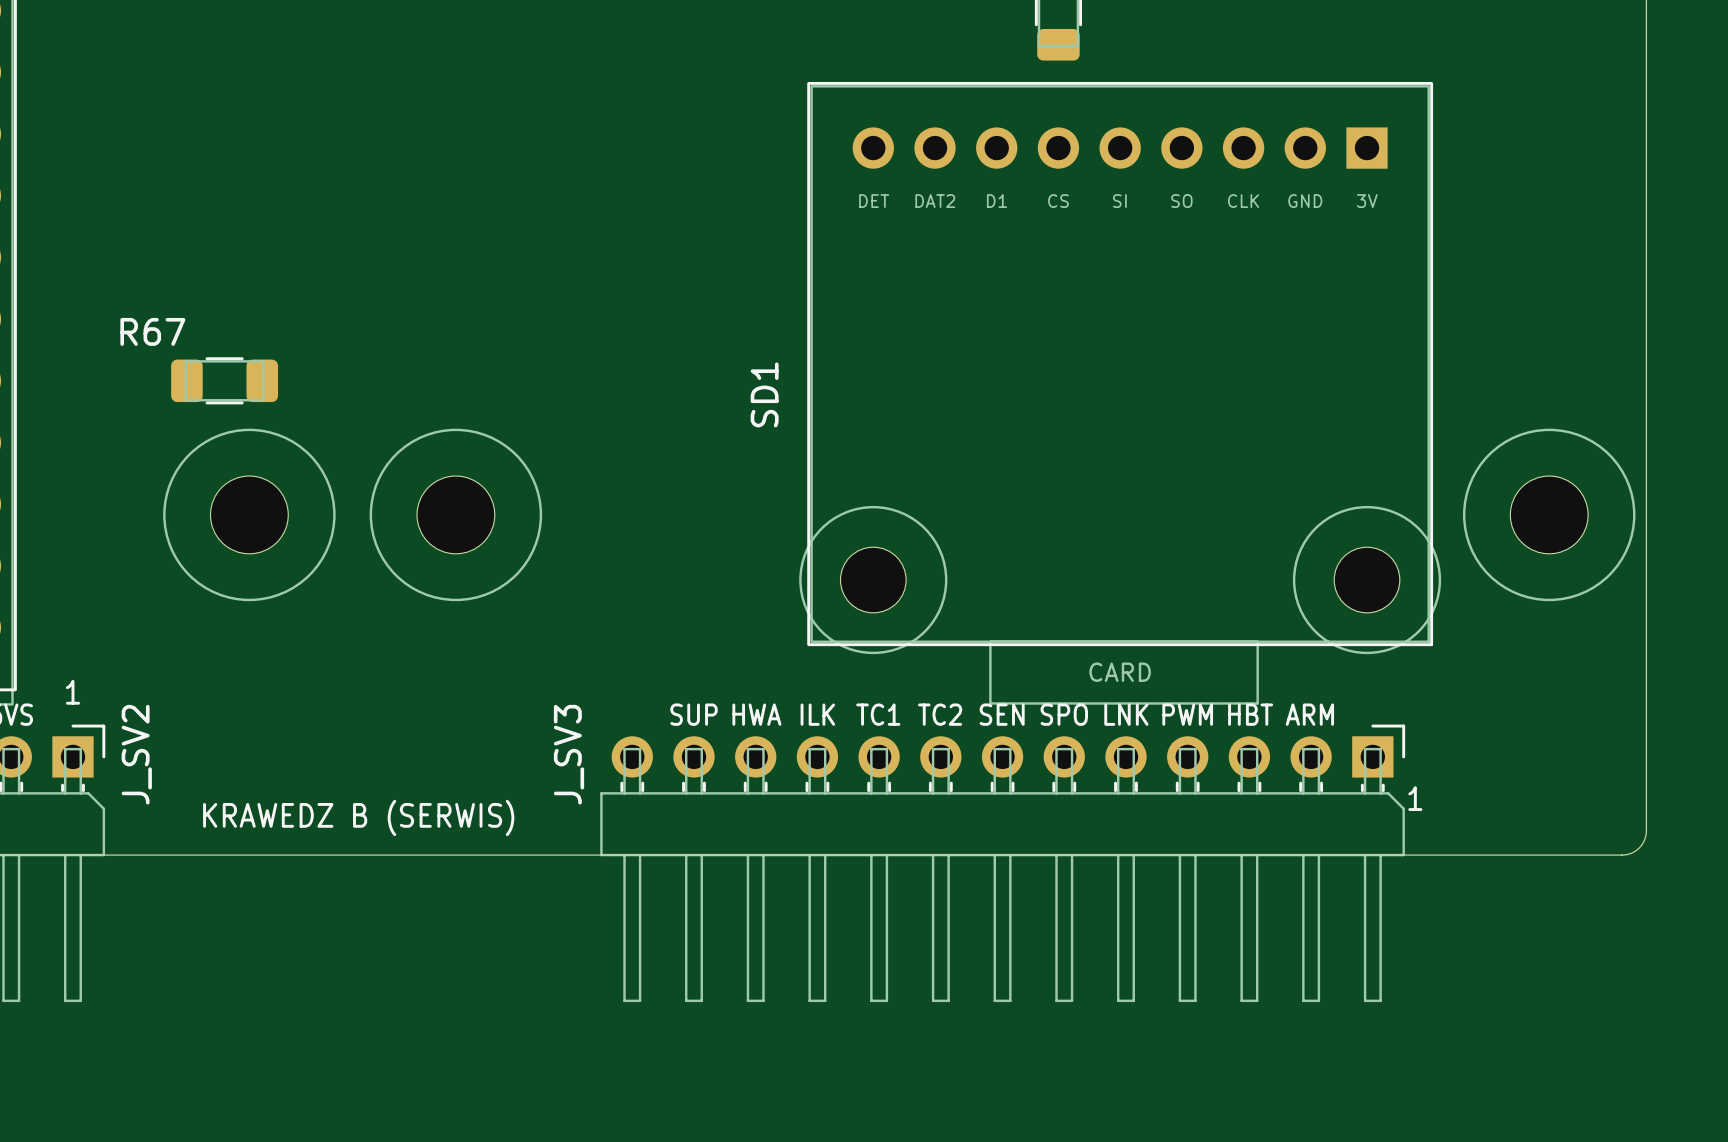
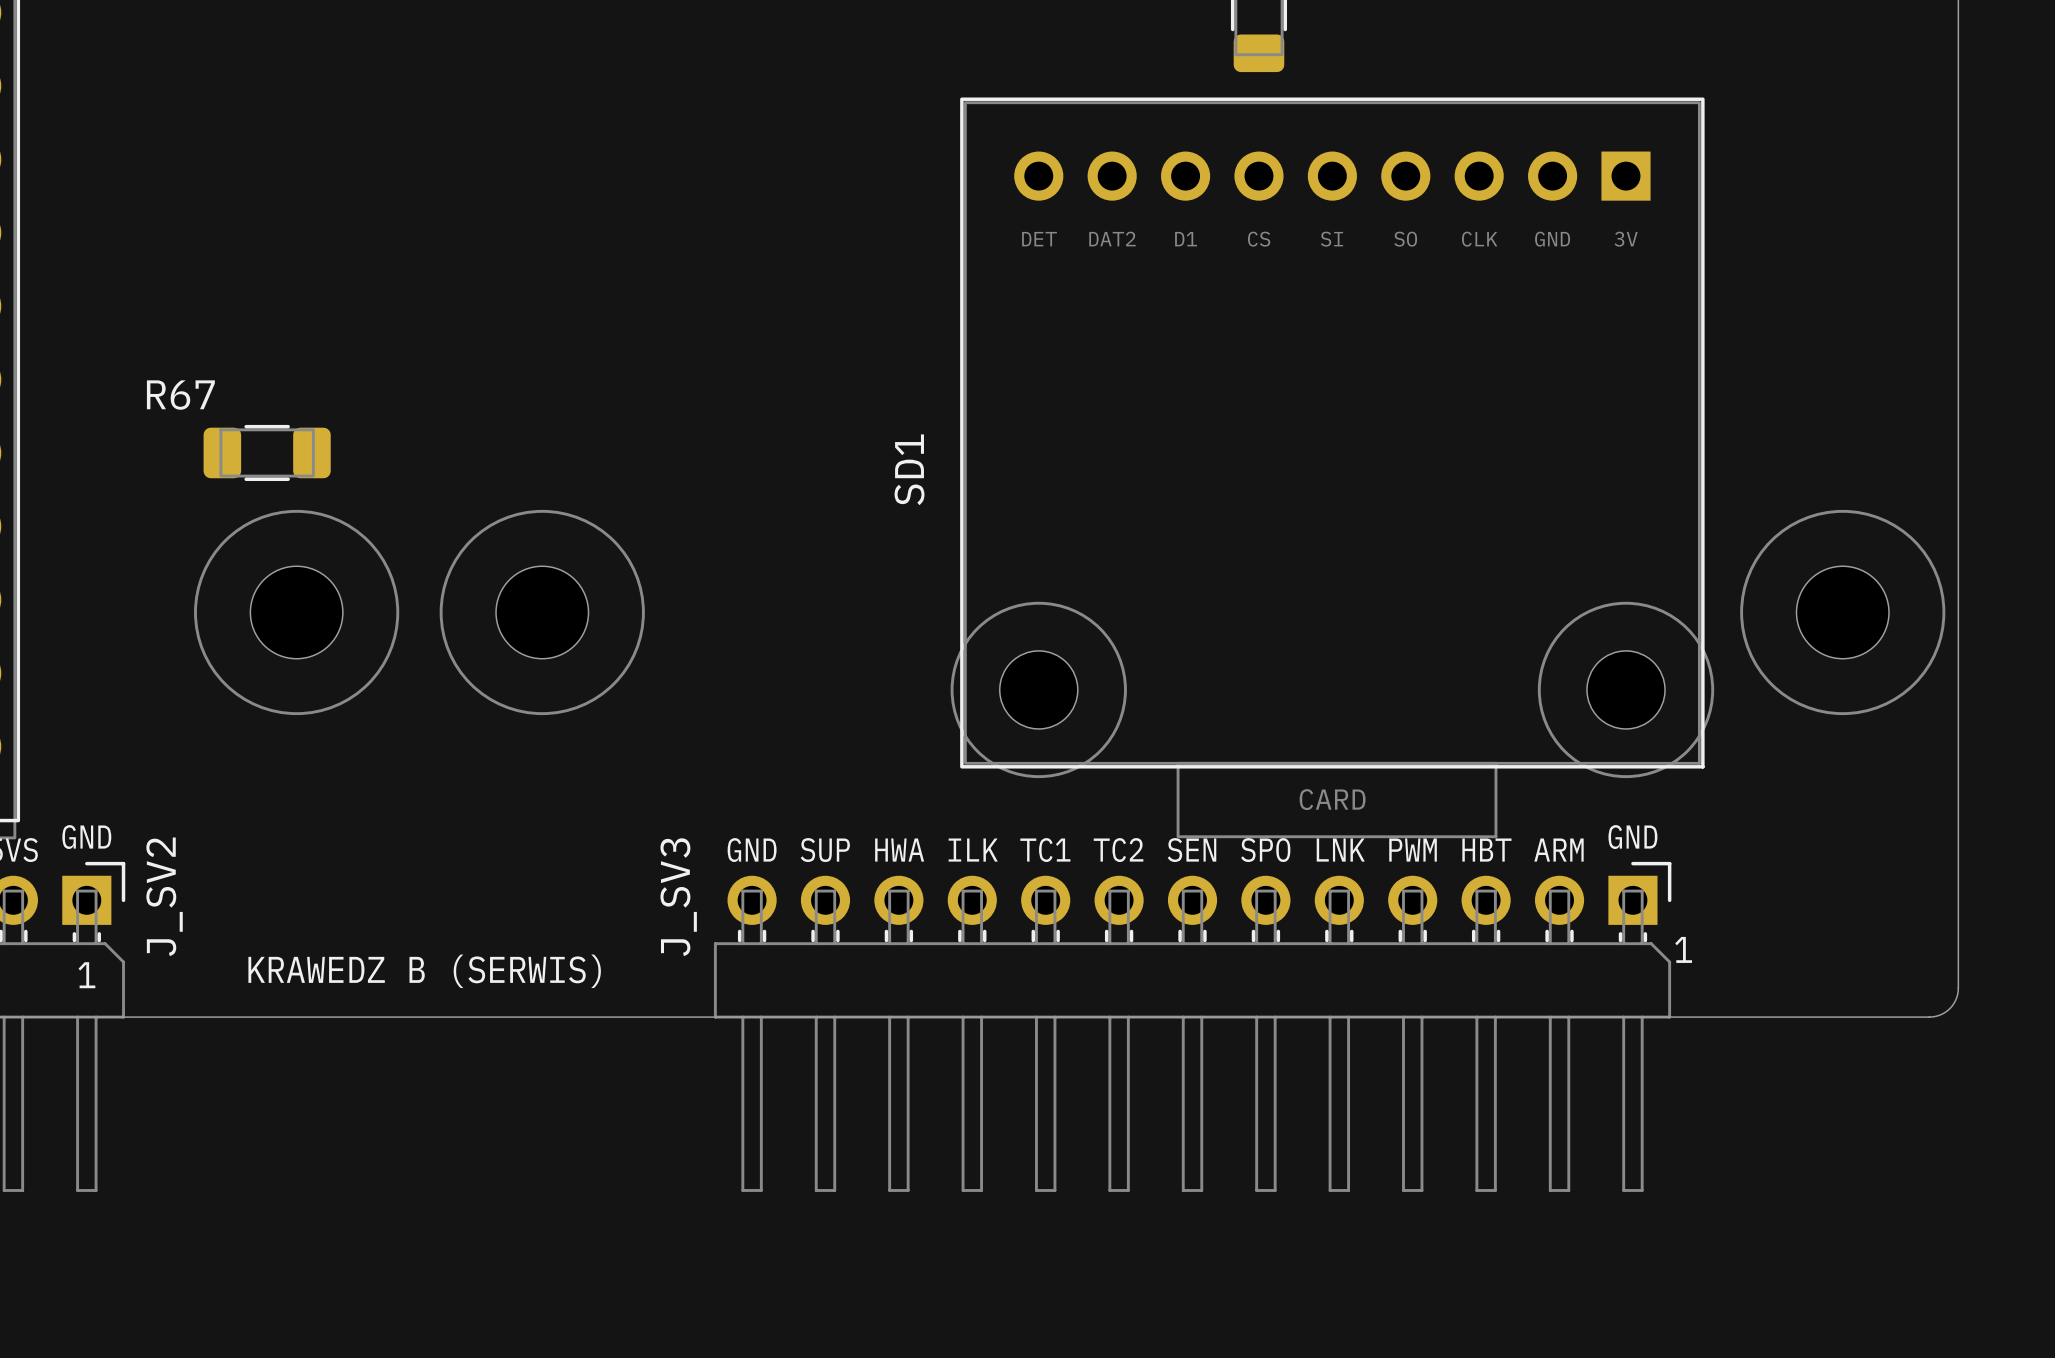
text: 1 (72, 692) -> GND (86, 837)
text: none -> GND (1632, 837)
text: none -> GND (752, 850)
text: none -> 1 (86, 975)

